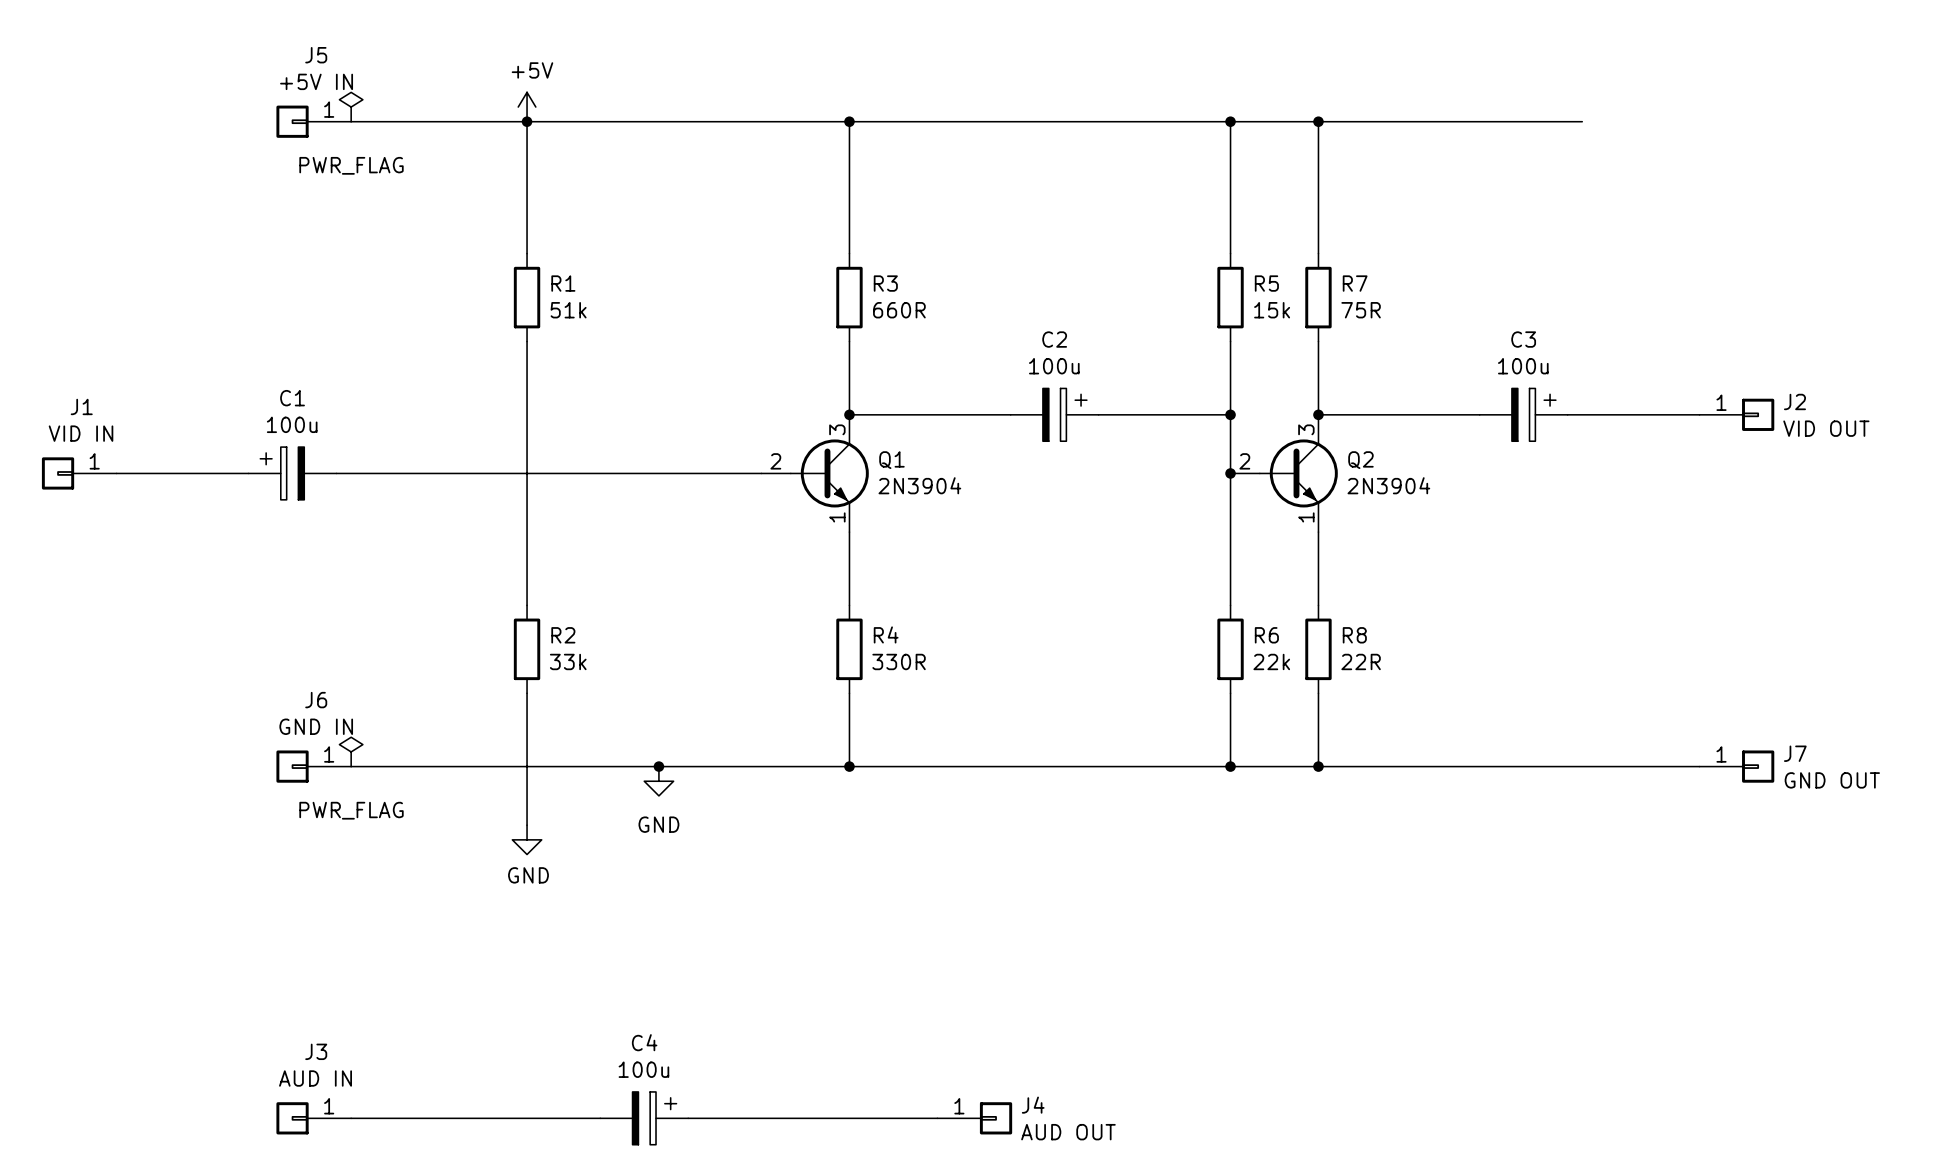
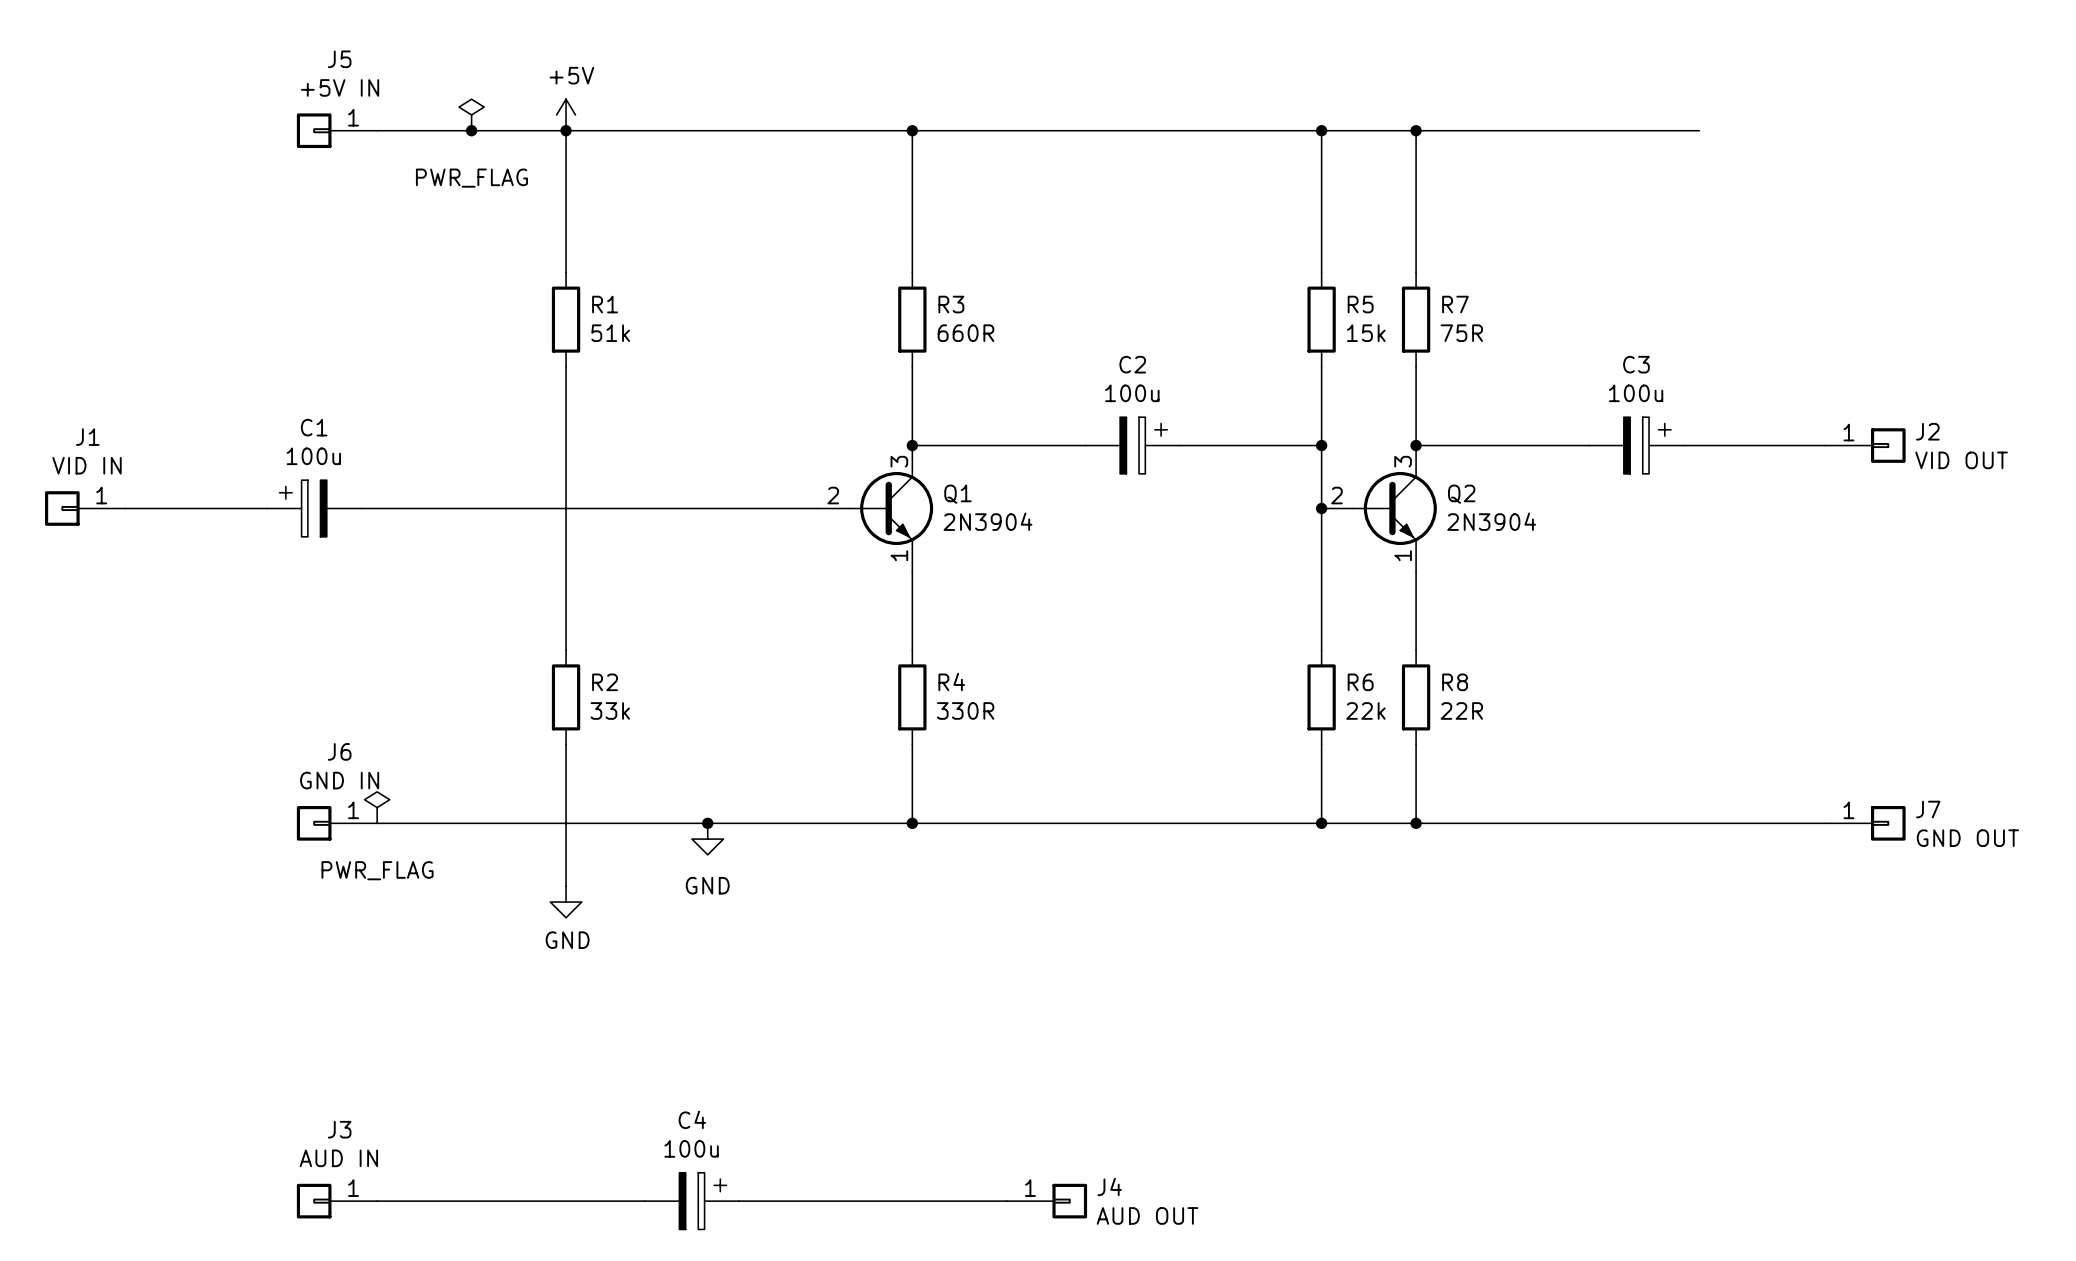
power symbol position: PWR_FLAG (351, 107) -> PWR_FLAG (471, 114)
junction: none -> (471, 130)

